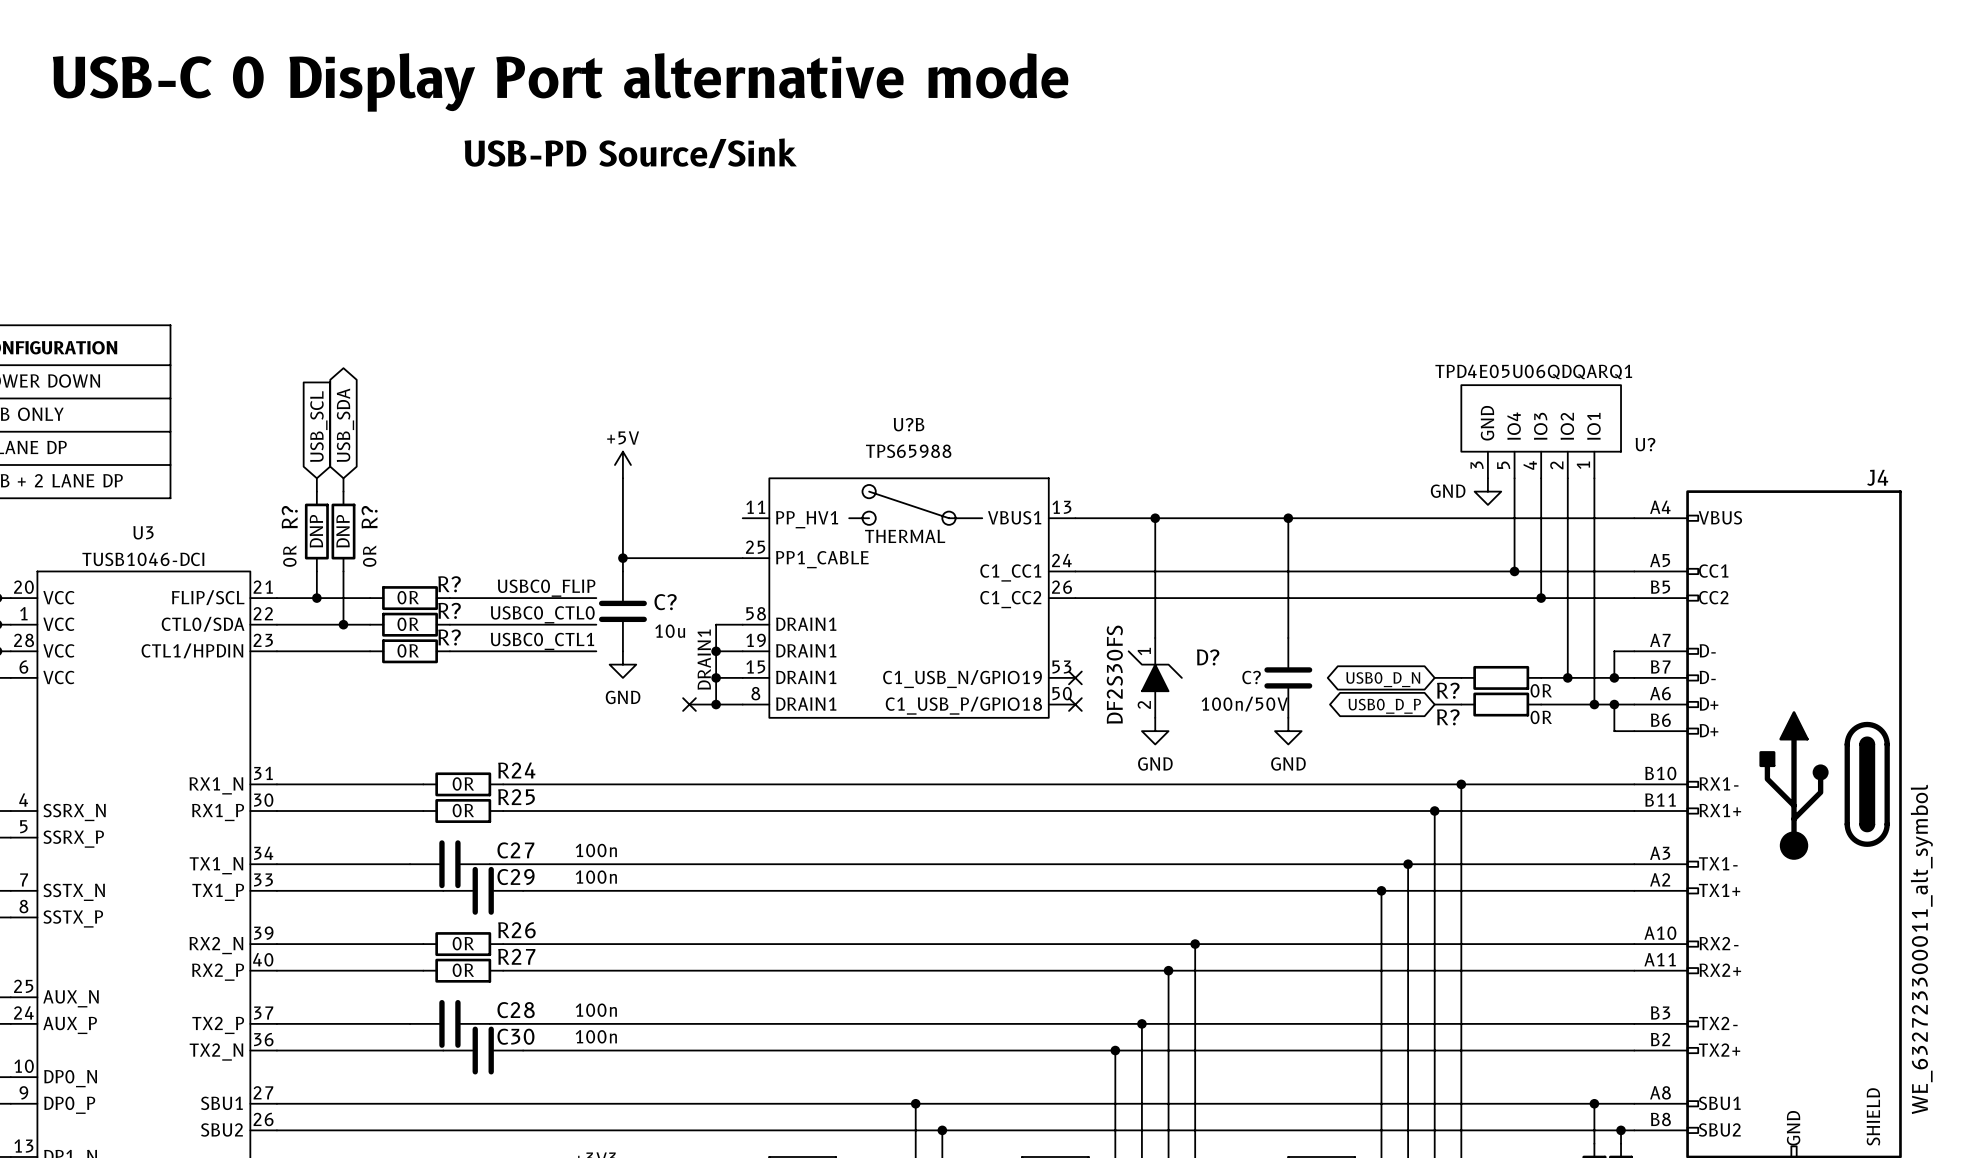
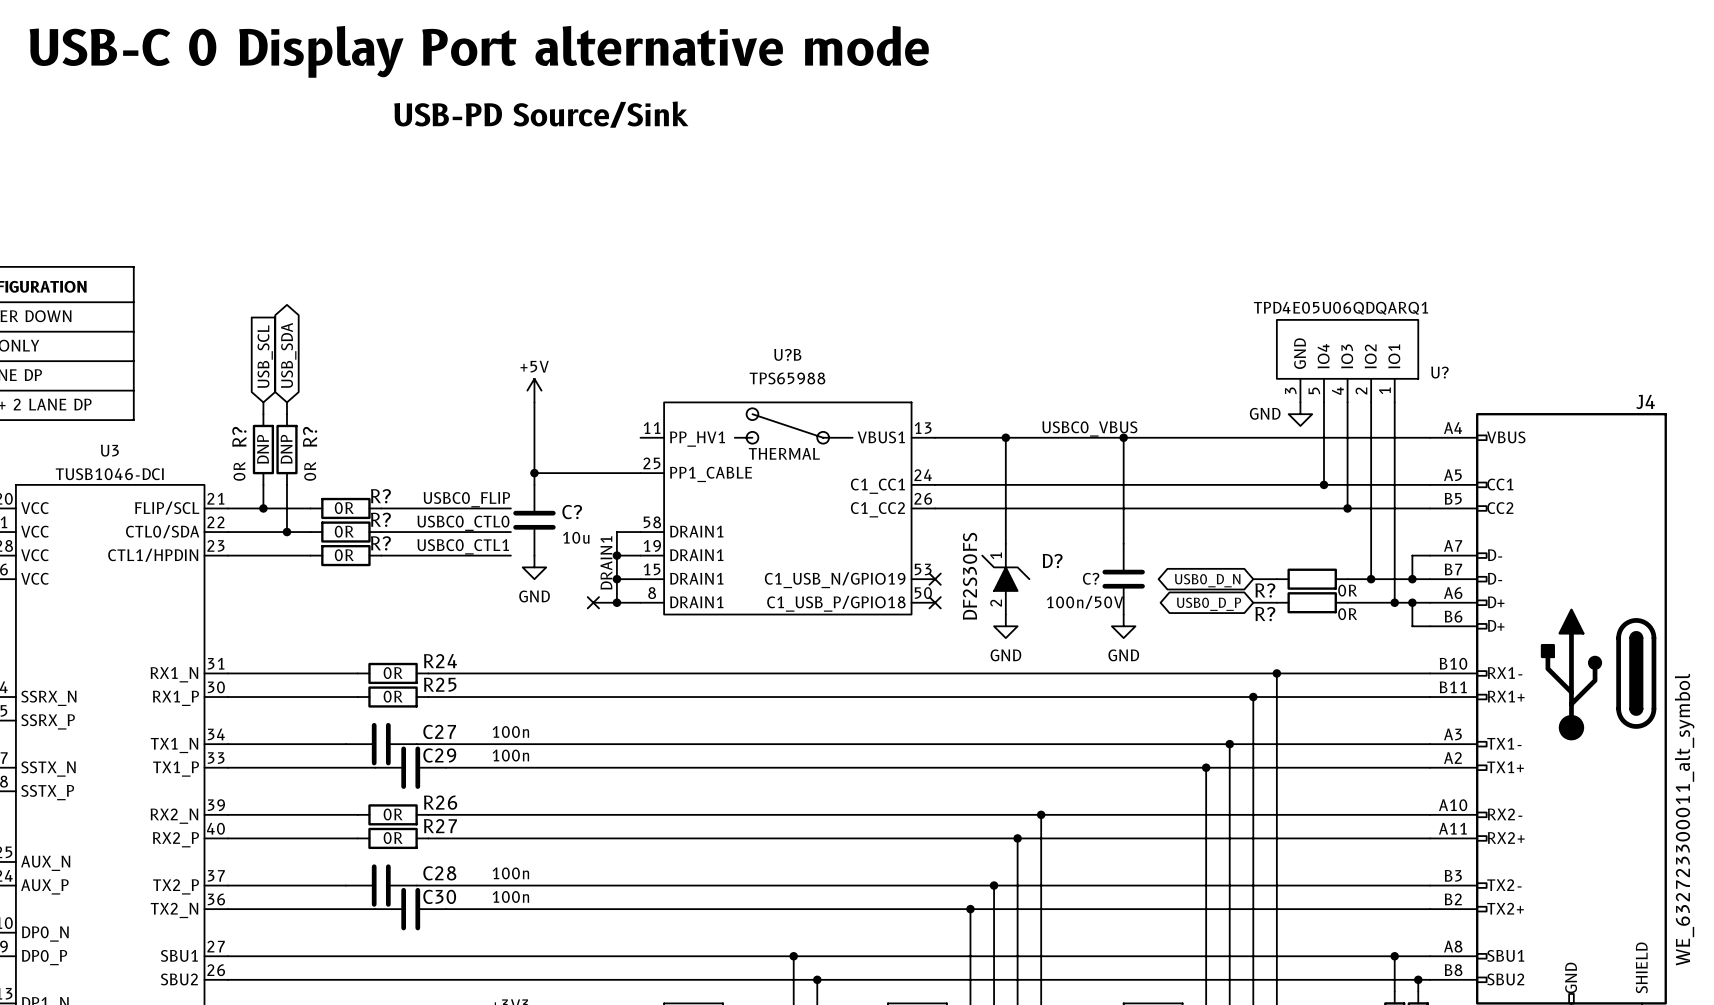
label: none -> USBC0_VBUS (1089, 429)

